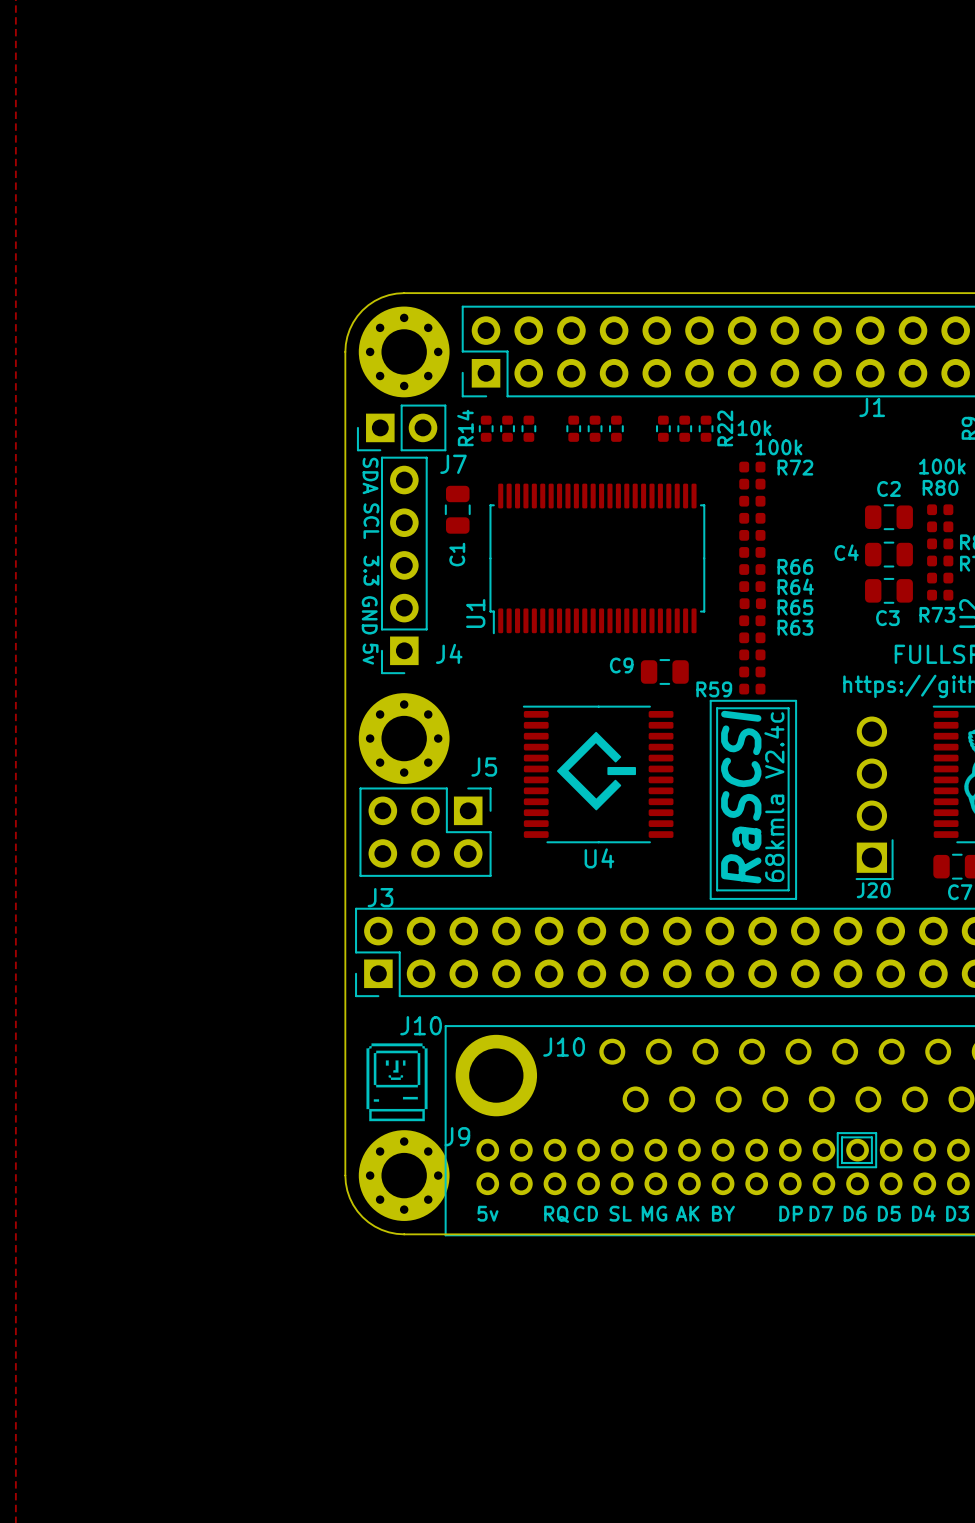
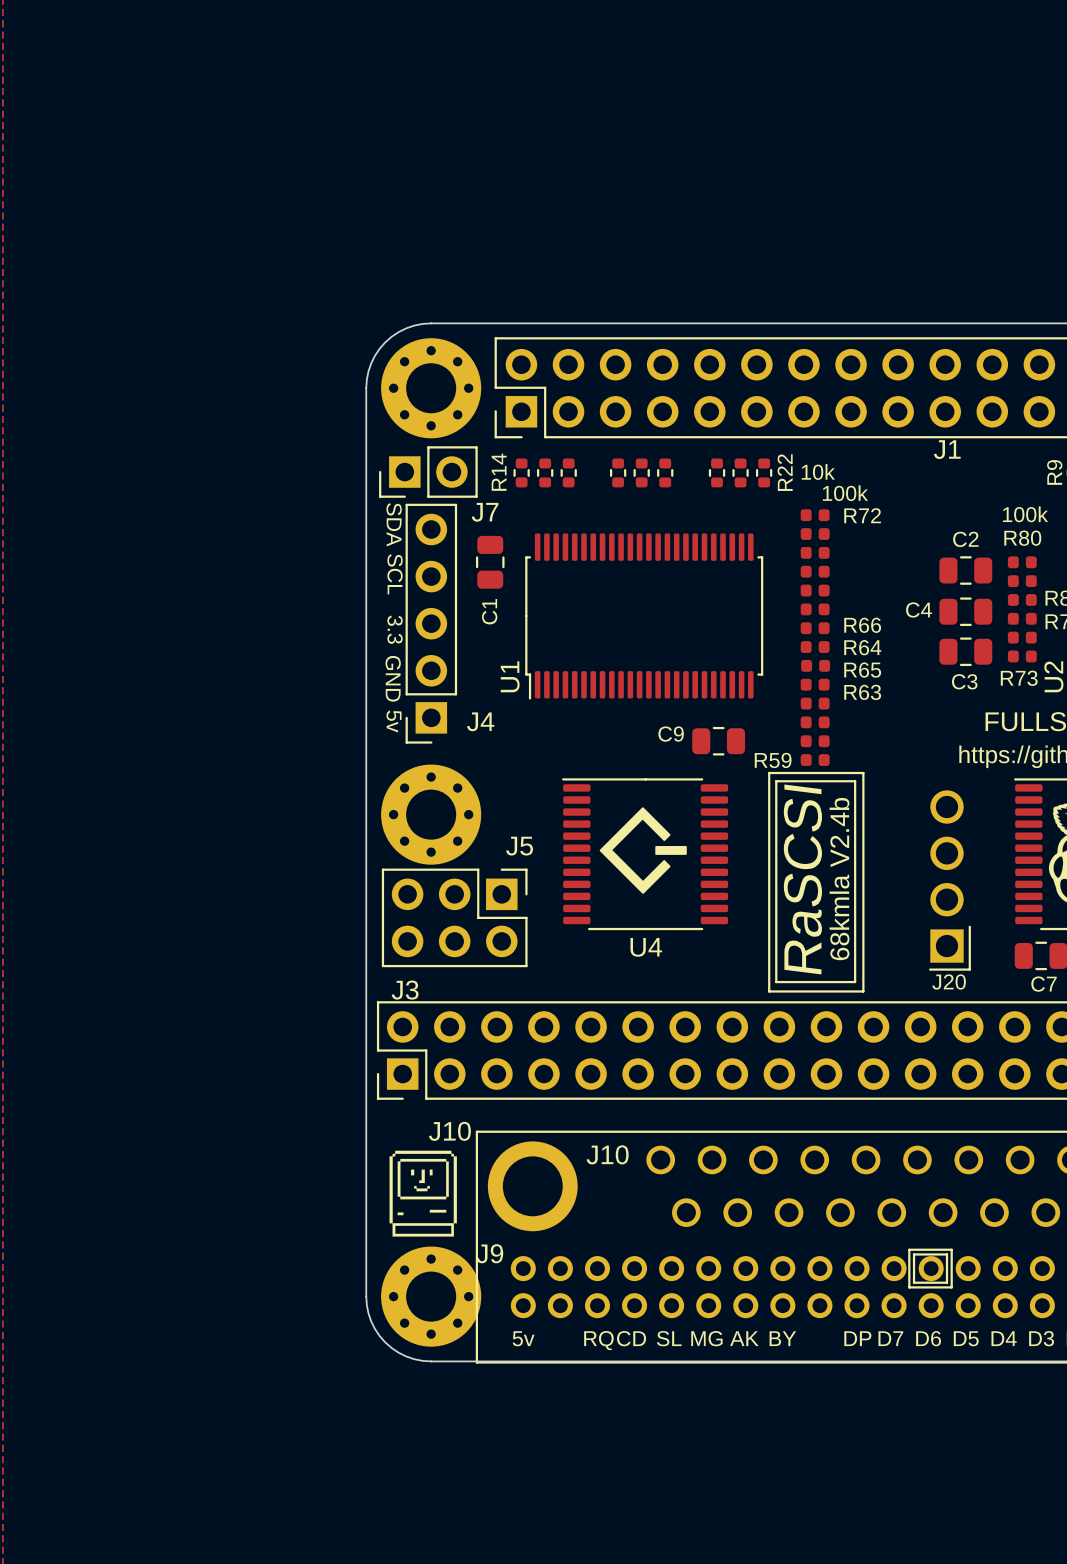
text: 68kmla V2.4c (774, 797) -> 68kmla V2.4b (839, 879)

